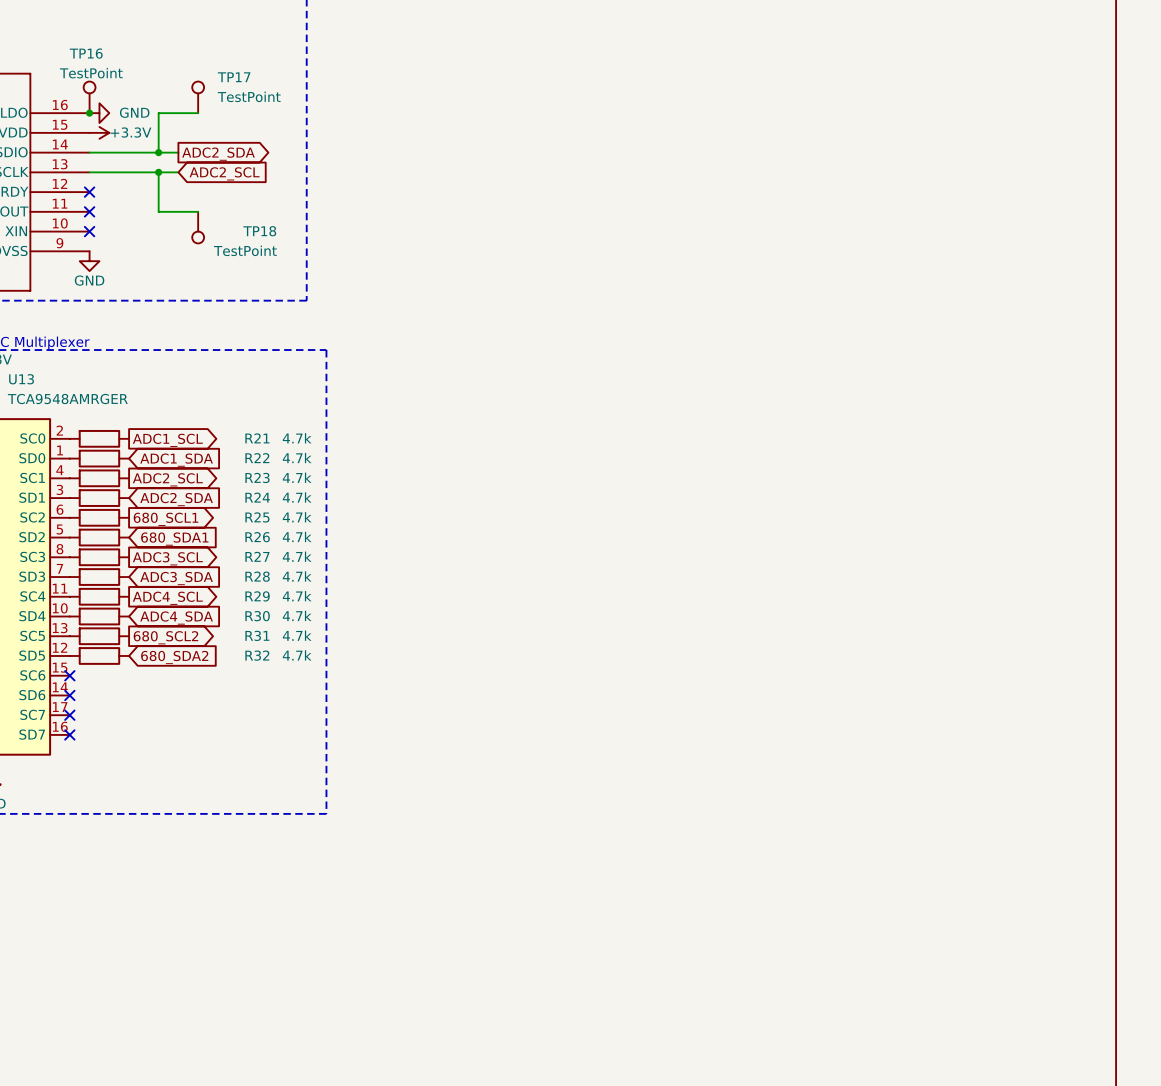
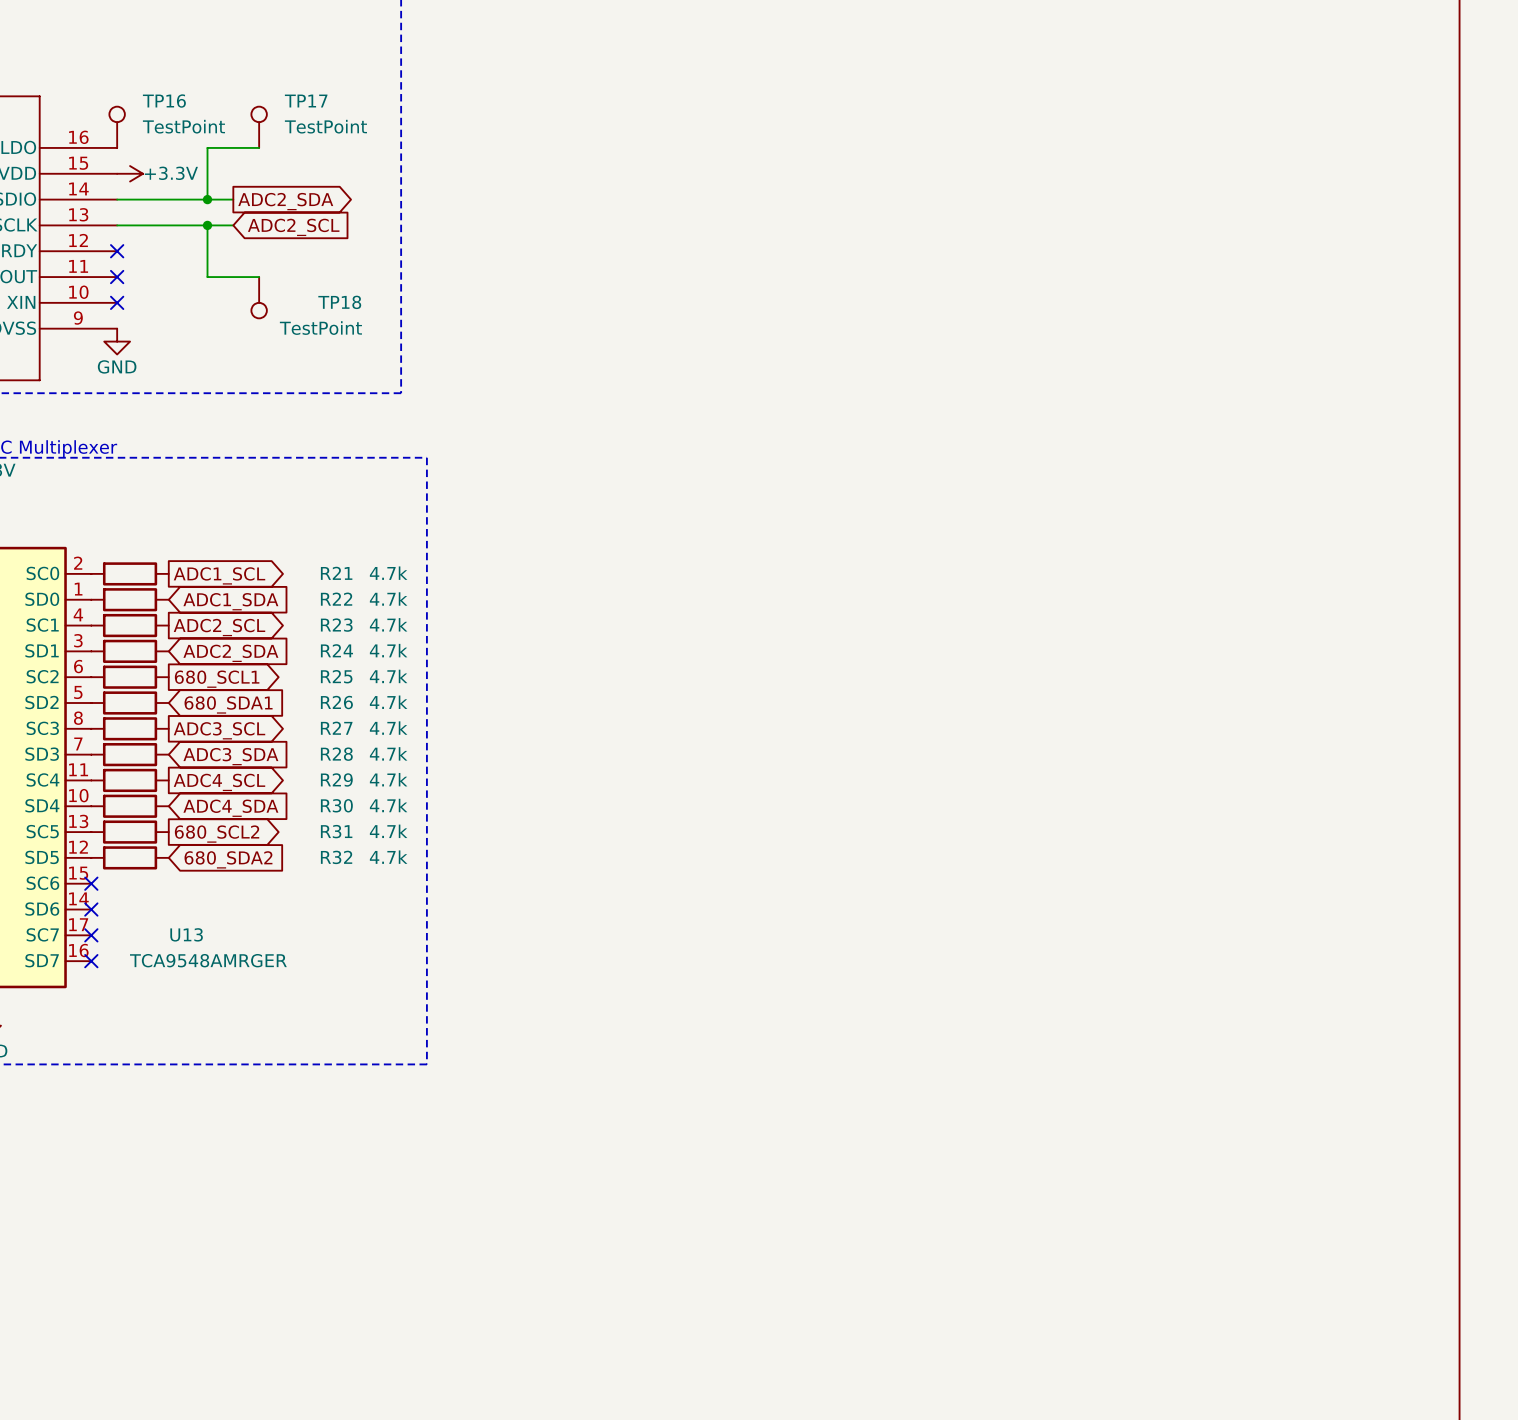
TP16 name position: TP16 (86, 53) -> TP16 (164, 101)
TP16 value position: TestPoint (91, 73) -> TestPoint (183, 126)
junction: (89, 113) -> none
power symbol: GND (99, 113) -> none
U13 name position: U13 (21, 379) -> U13 (186, 934)
U13 value position: TCA9548AMRGER (67, 399) -> TCA9548AMRGER (208, 960)

